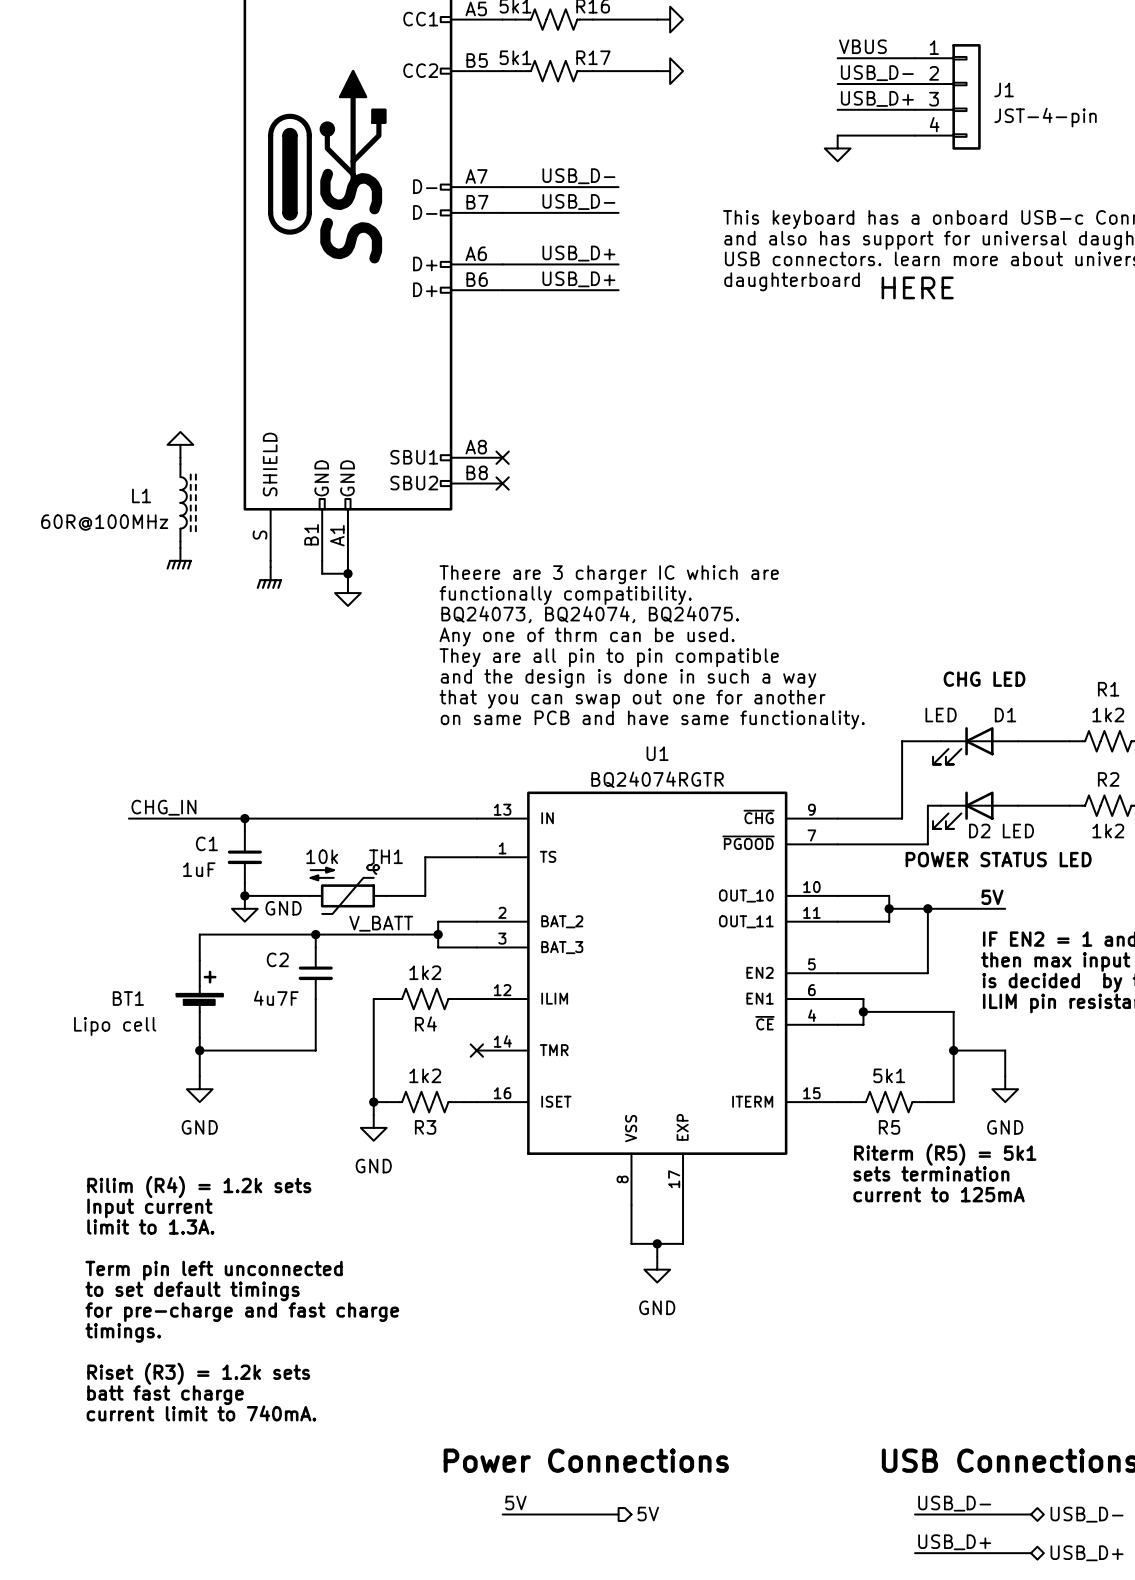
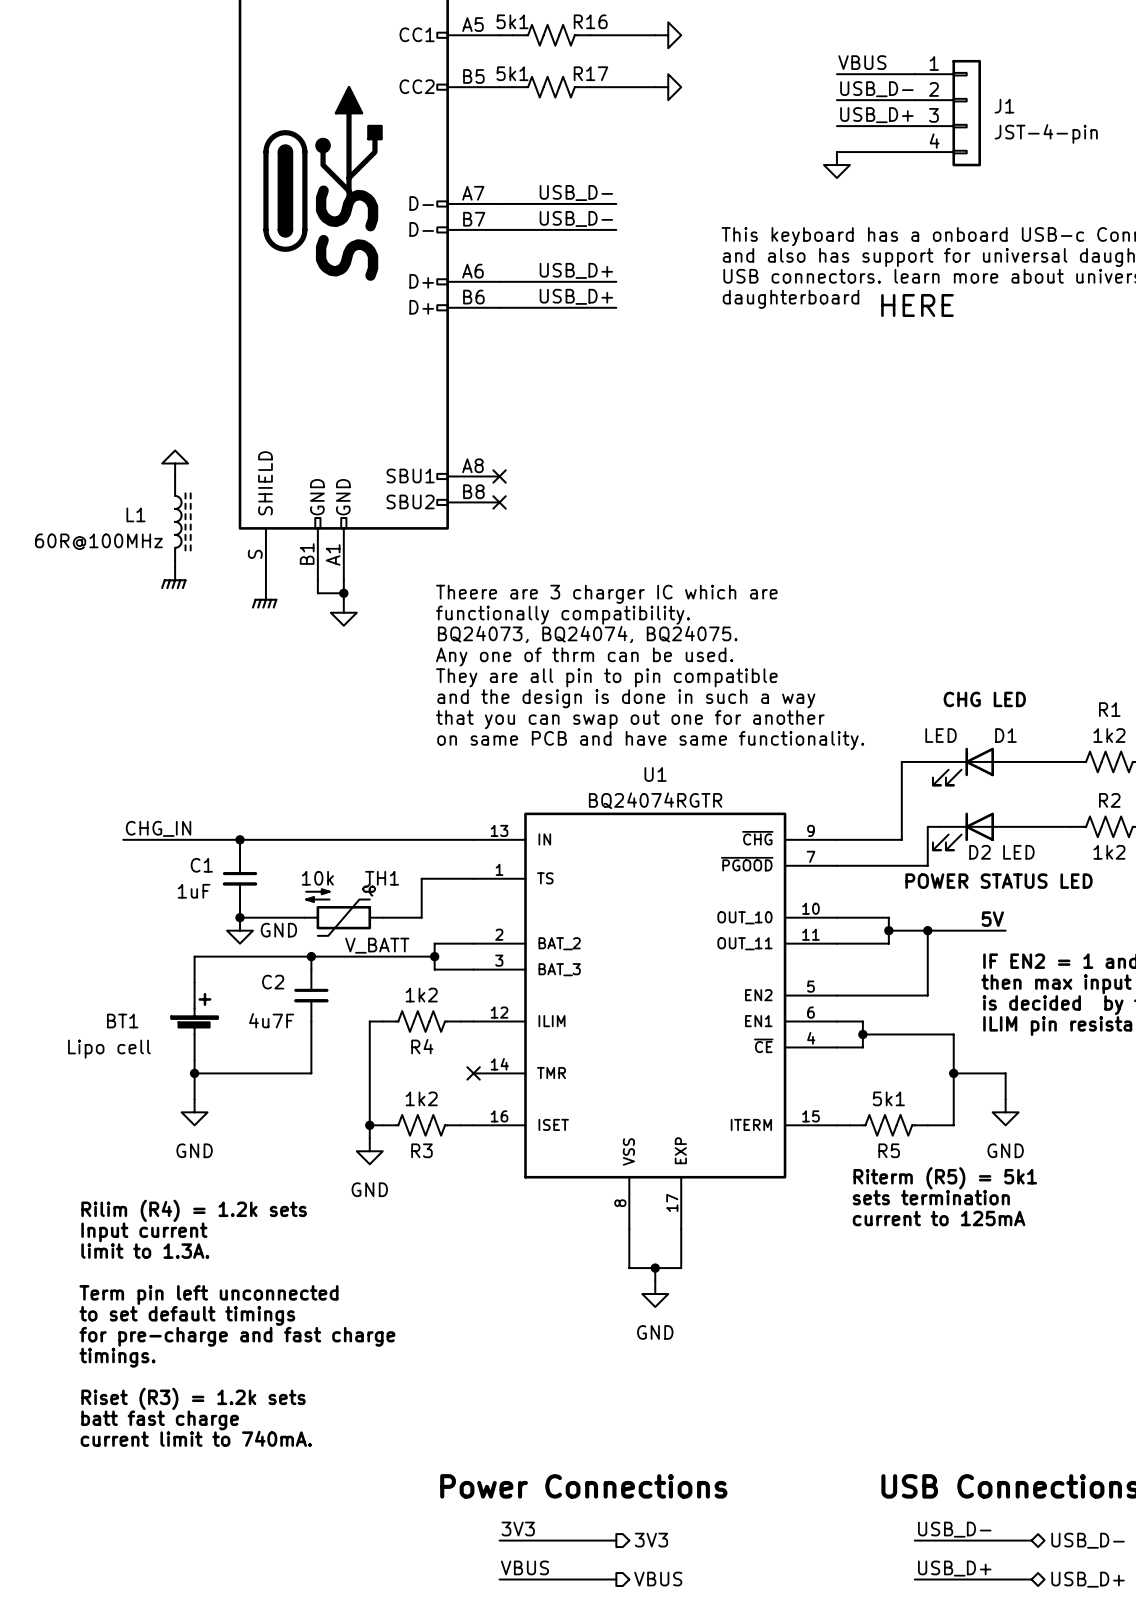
label: 5V (515, 1503) -> 3V3 (518, 1529)
hierarchical label: 5V (648, 1514) -> 3V3 (651, 1540)
label: none -> VBUS (524, 1567)
hierarchical label: none -> VBUS (658, 1579)
wire: none -> (499, 1579) (616, 1579)

